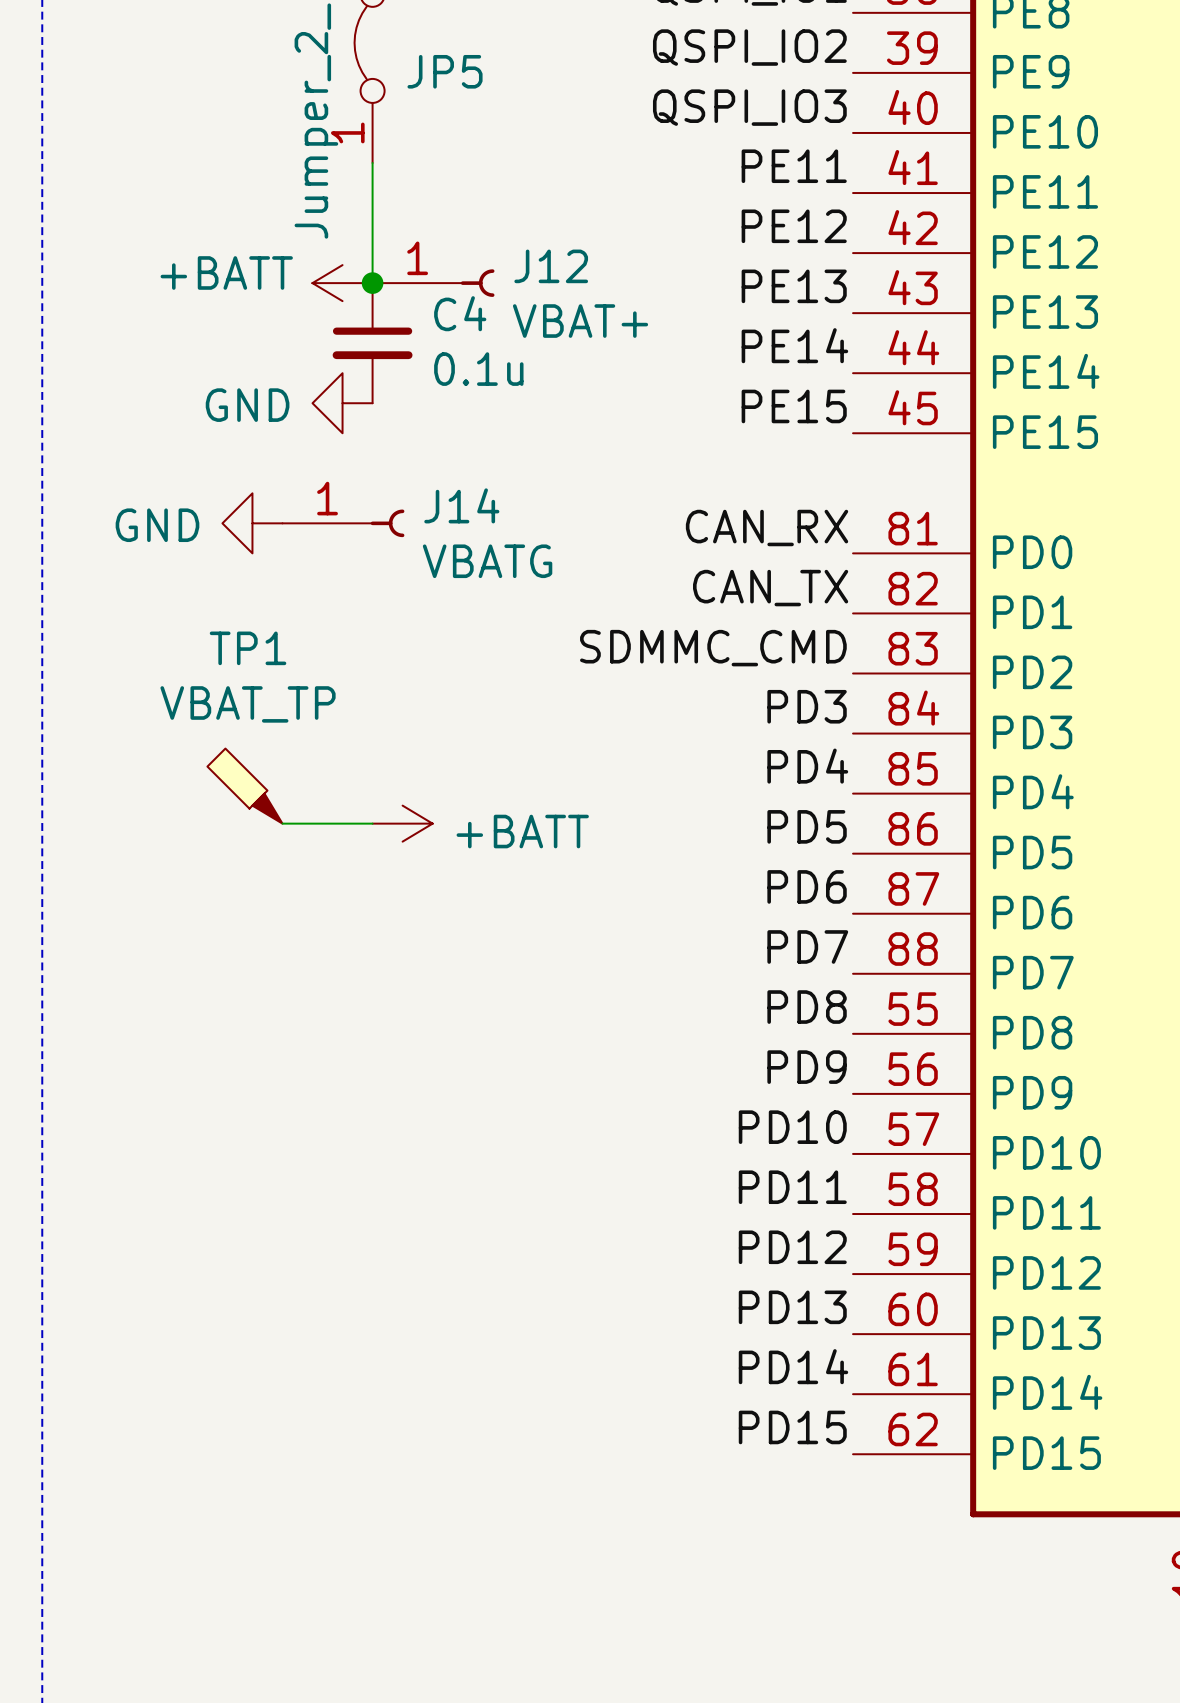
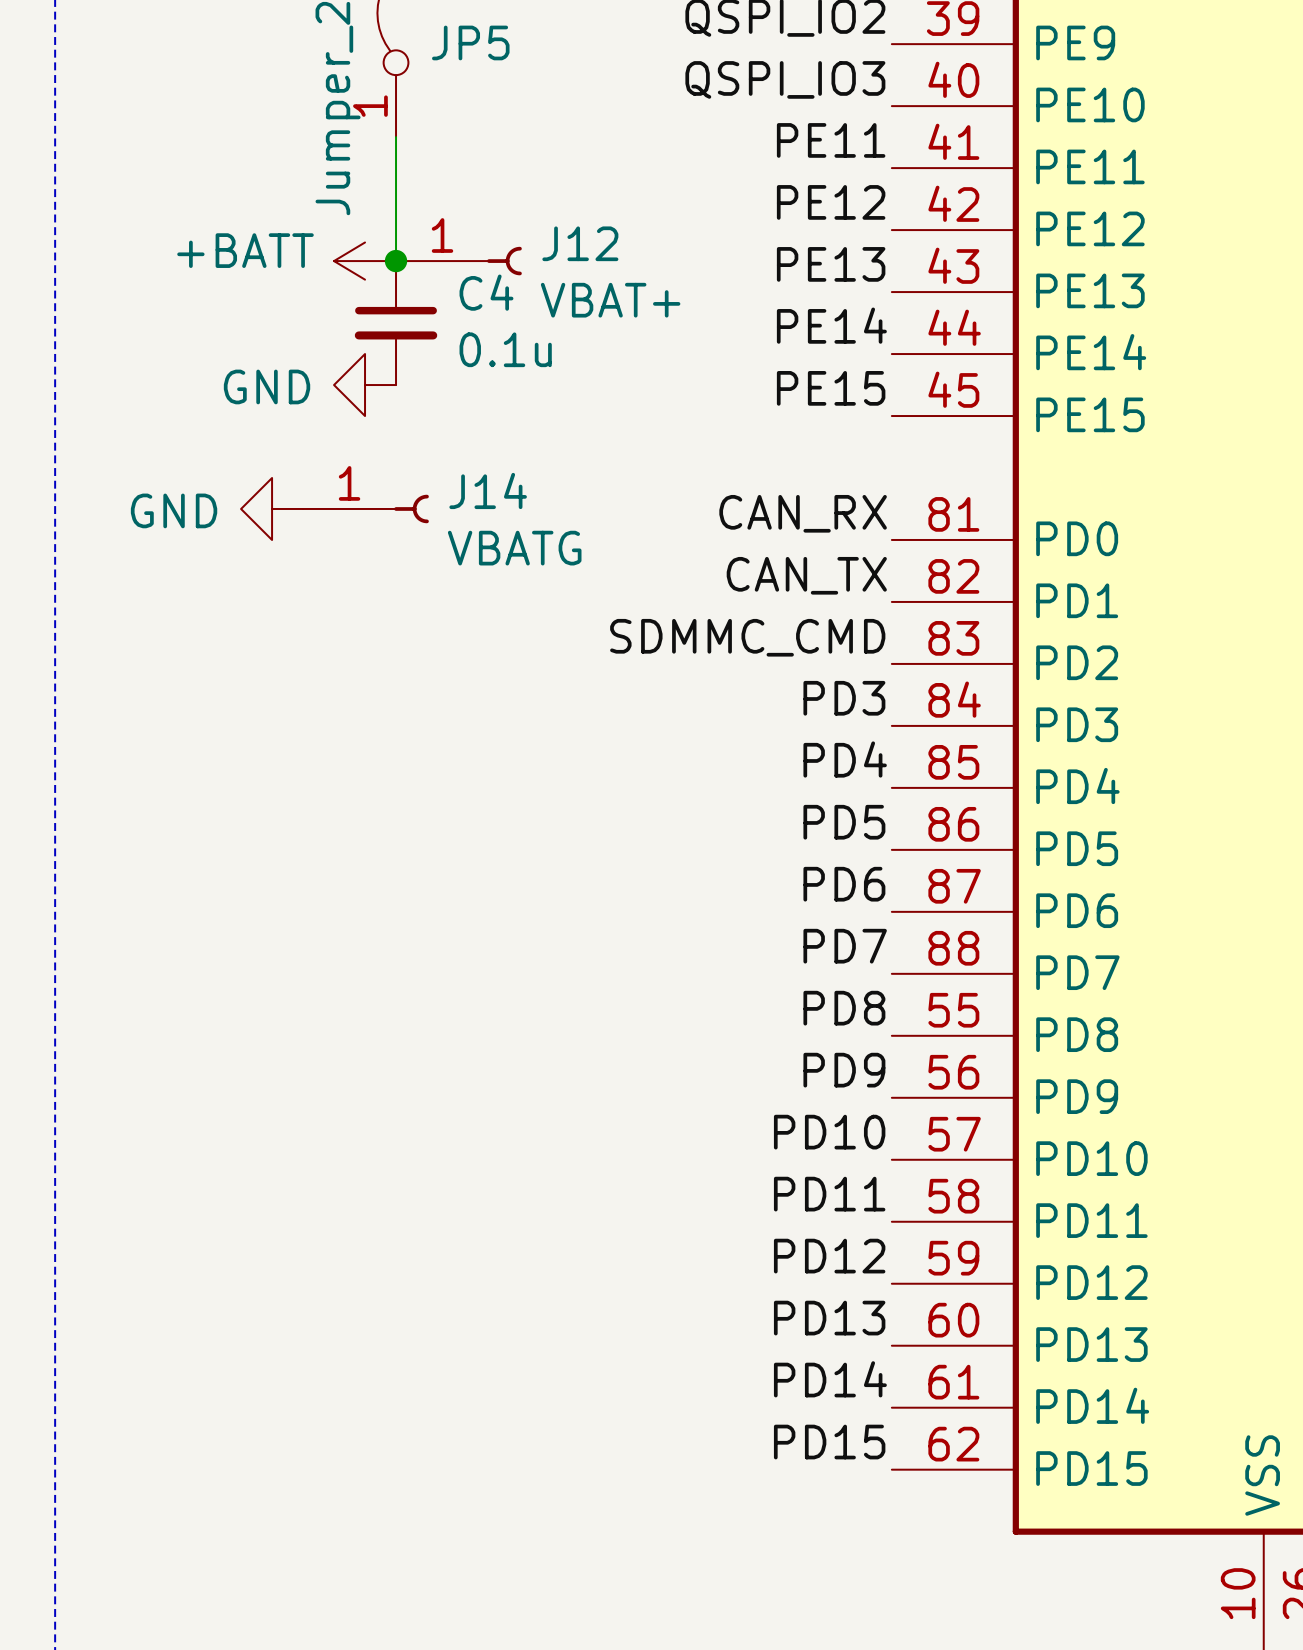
TP1: VBAT_TP (244, 786) -> none
wire: (282, 823) (372, 823) -> none
power symbol: +BATT (402, 823) -> none

